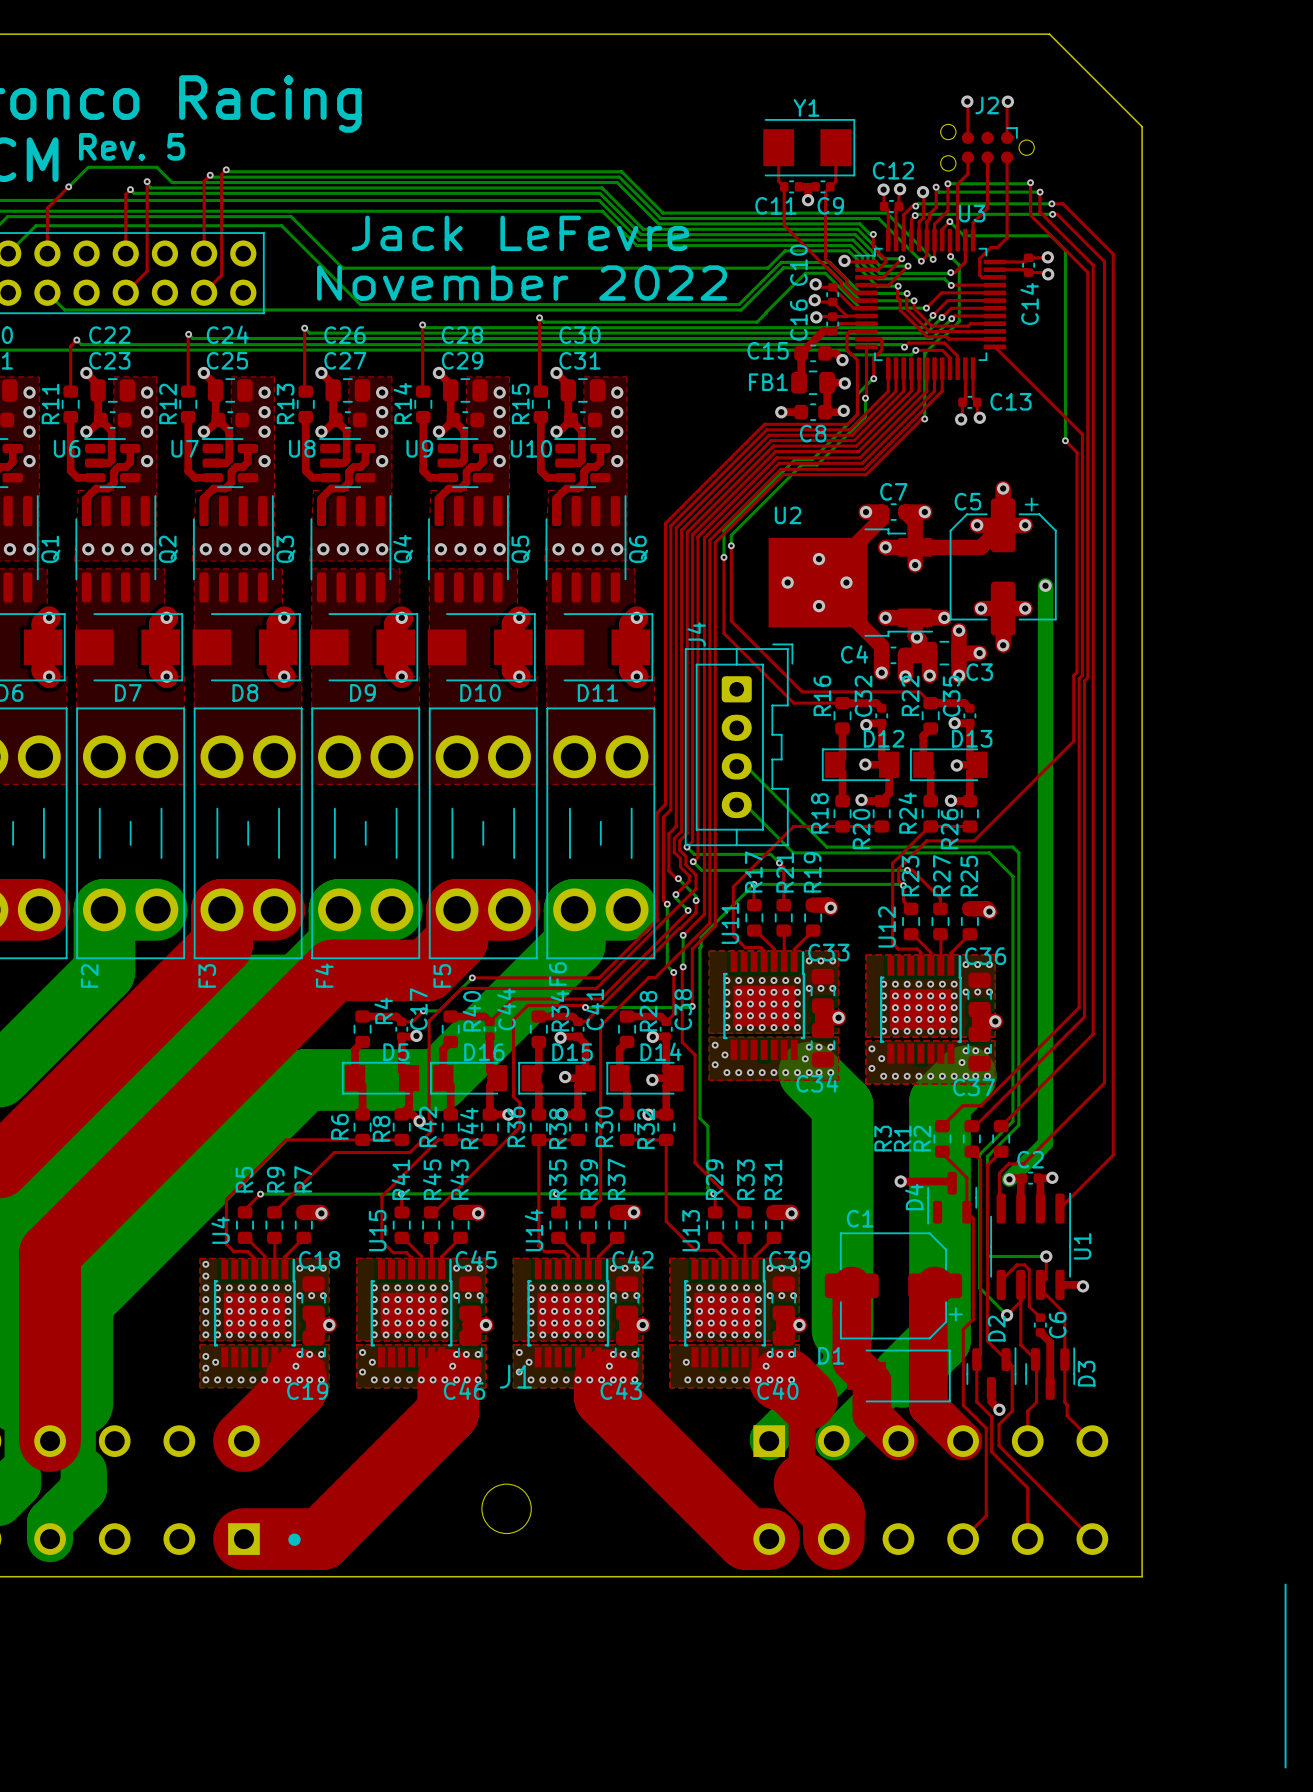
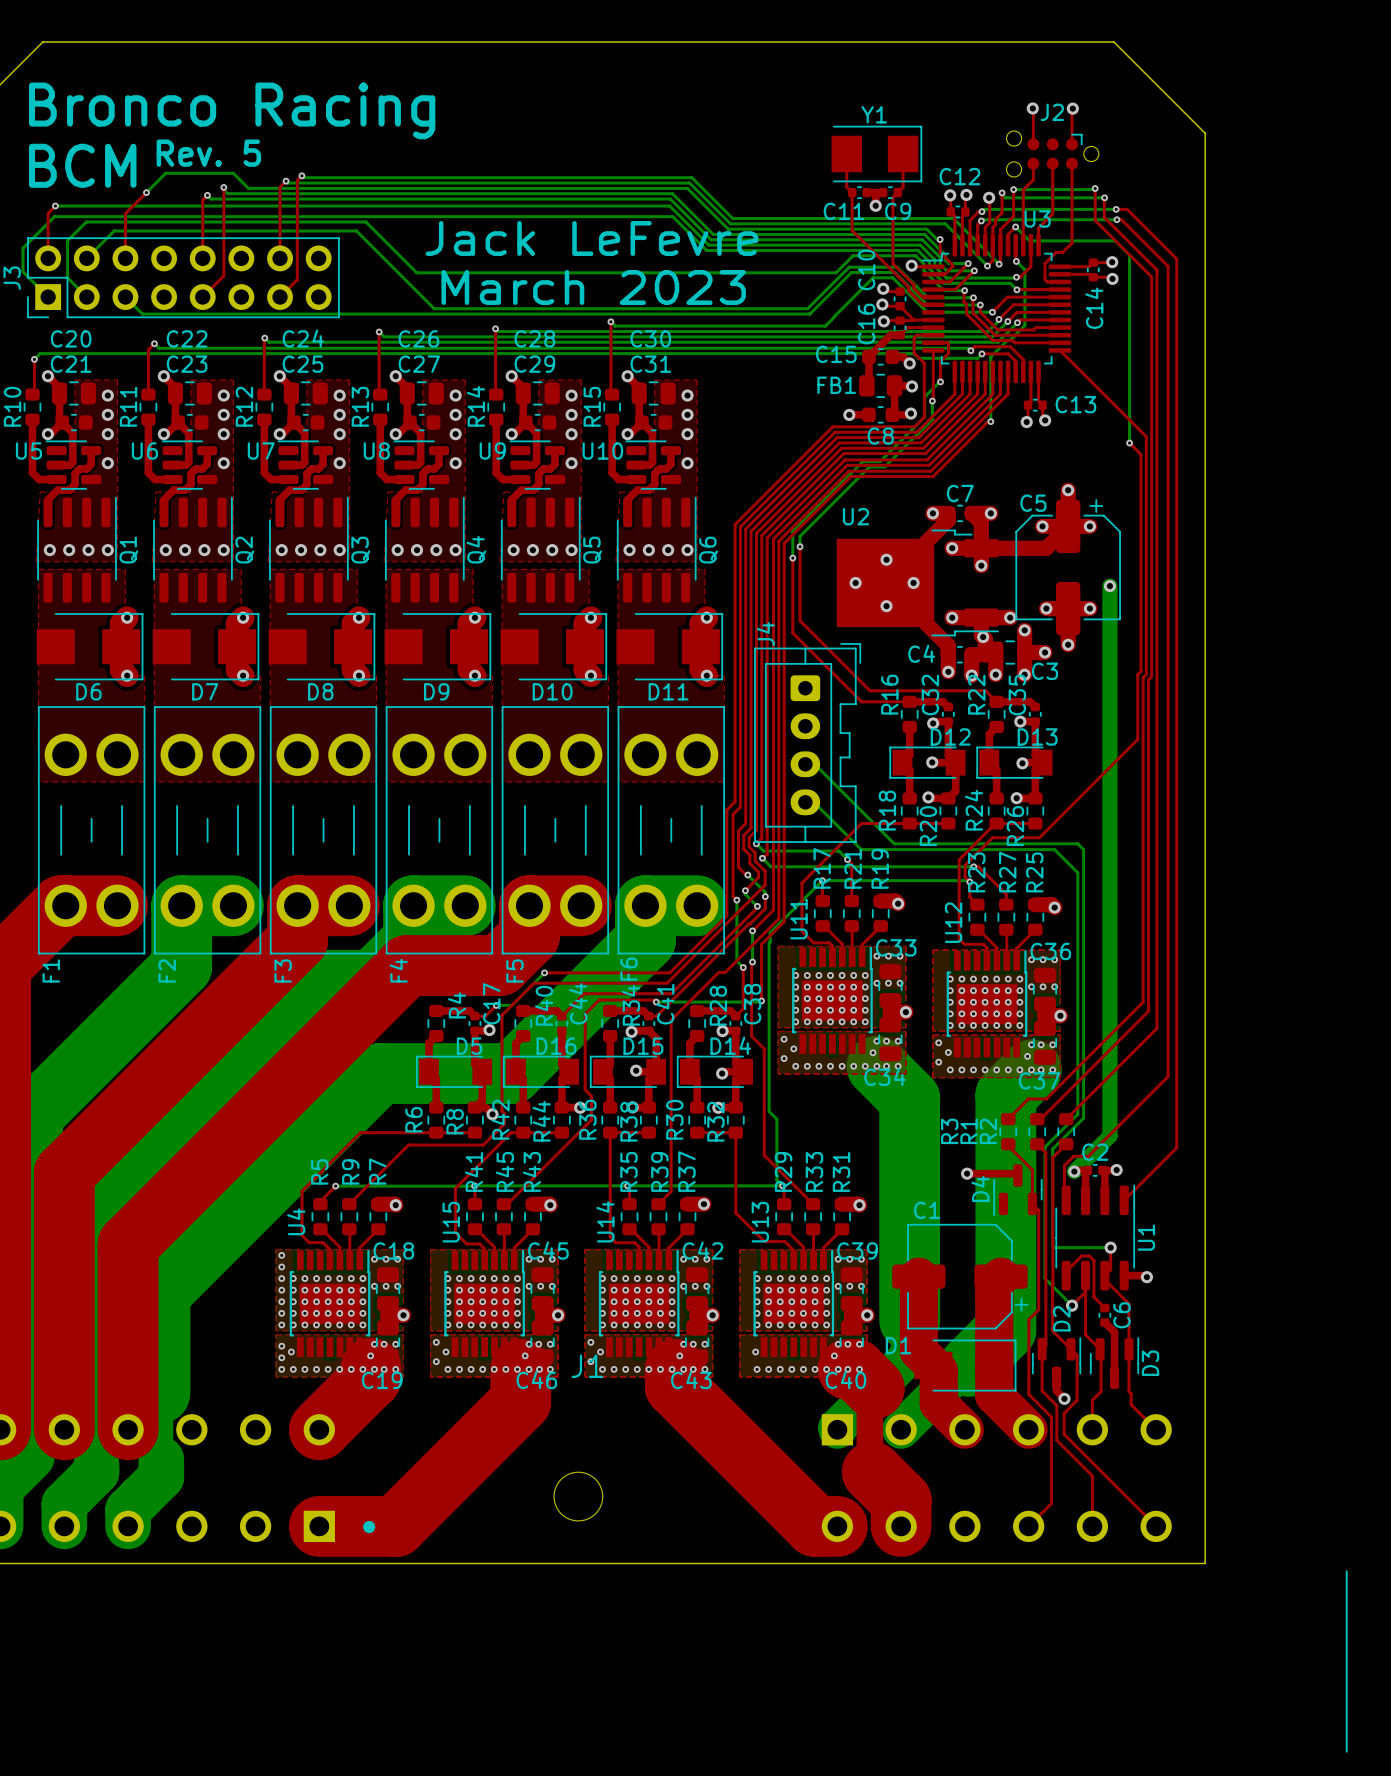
text: November 2022 (522, 283) -> March 2023 (593, 287)
top track: (832, 287) (853, 308) (866, 308) -> none

